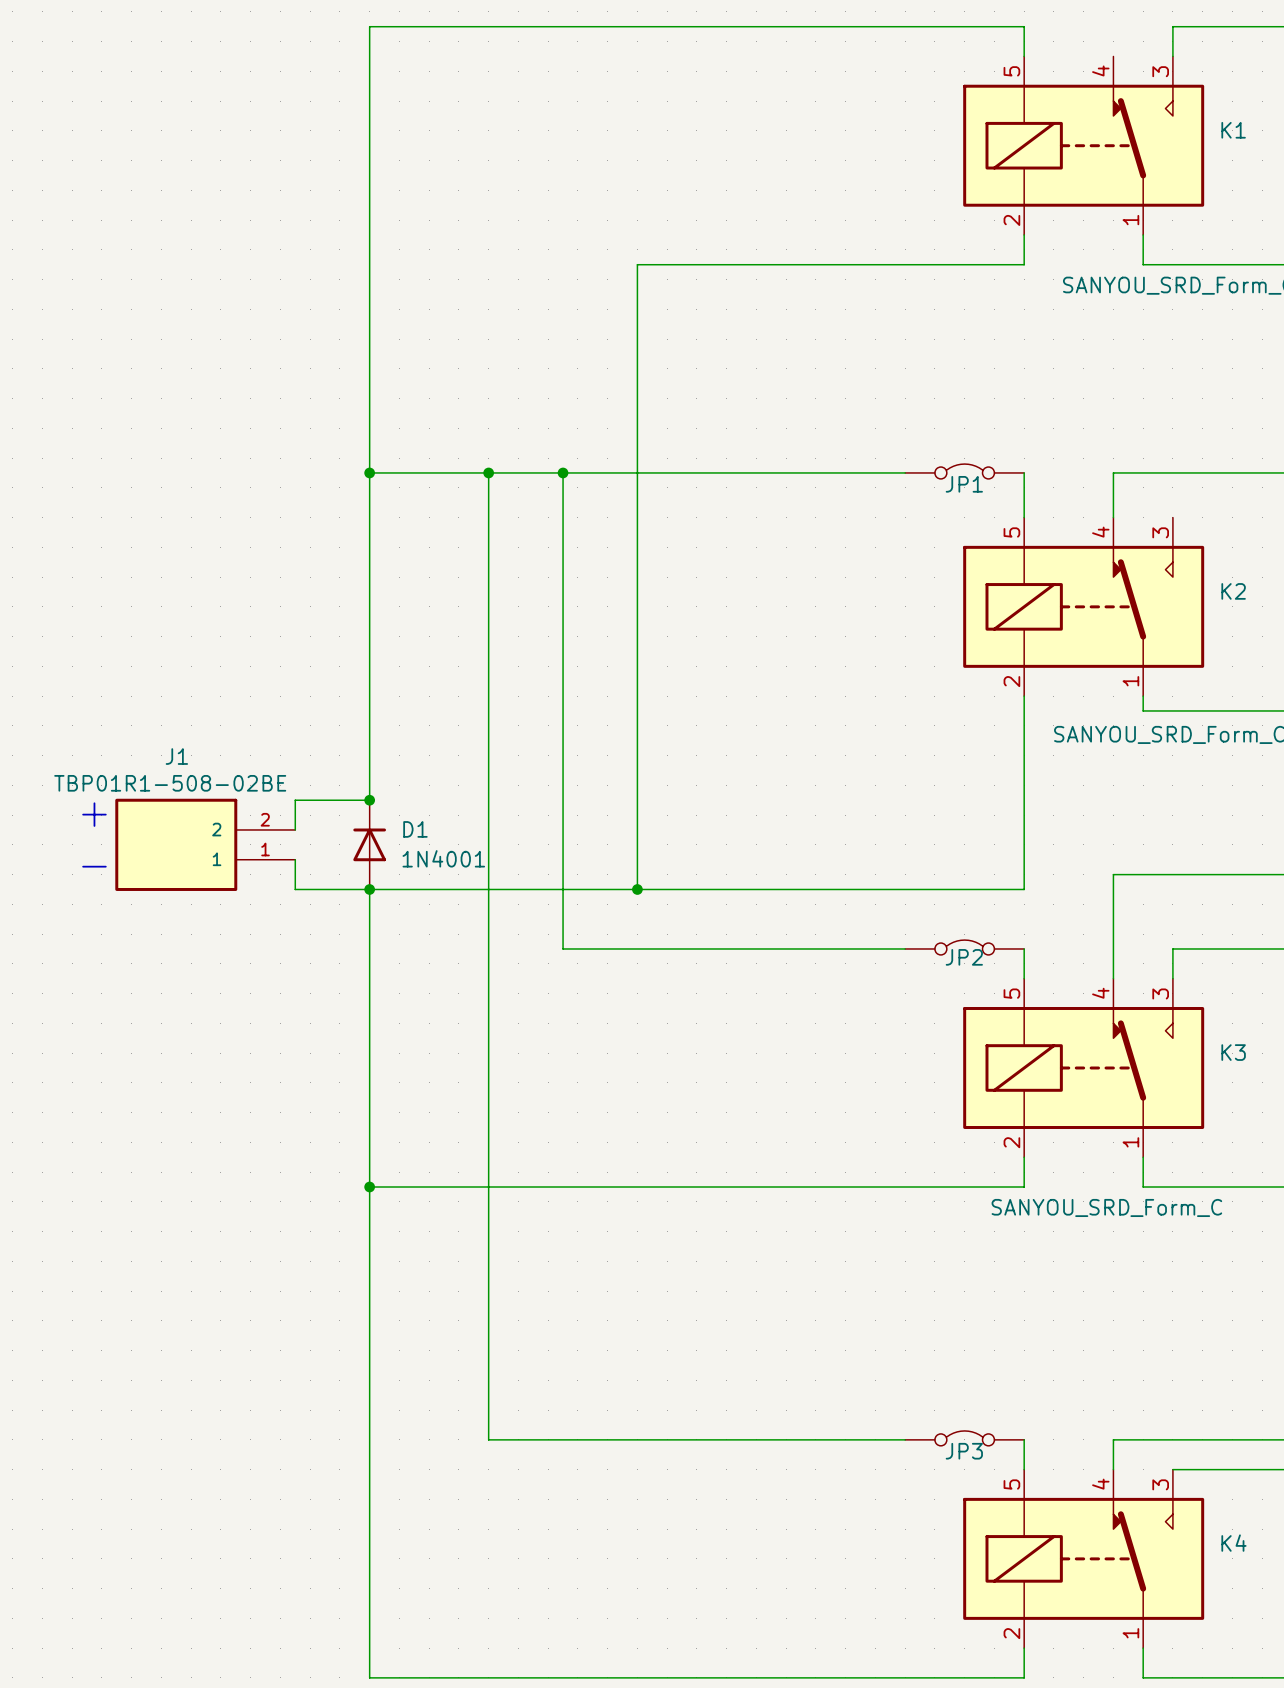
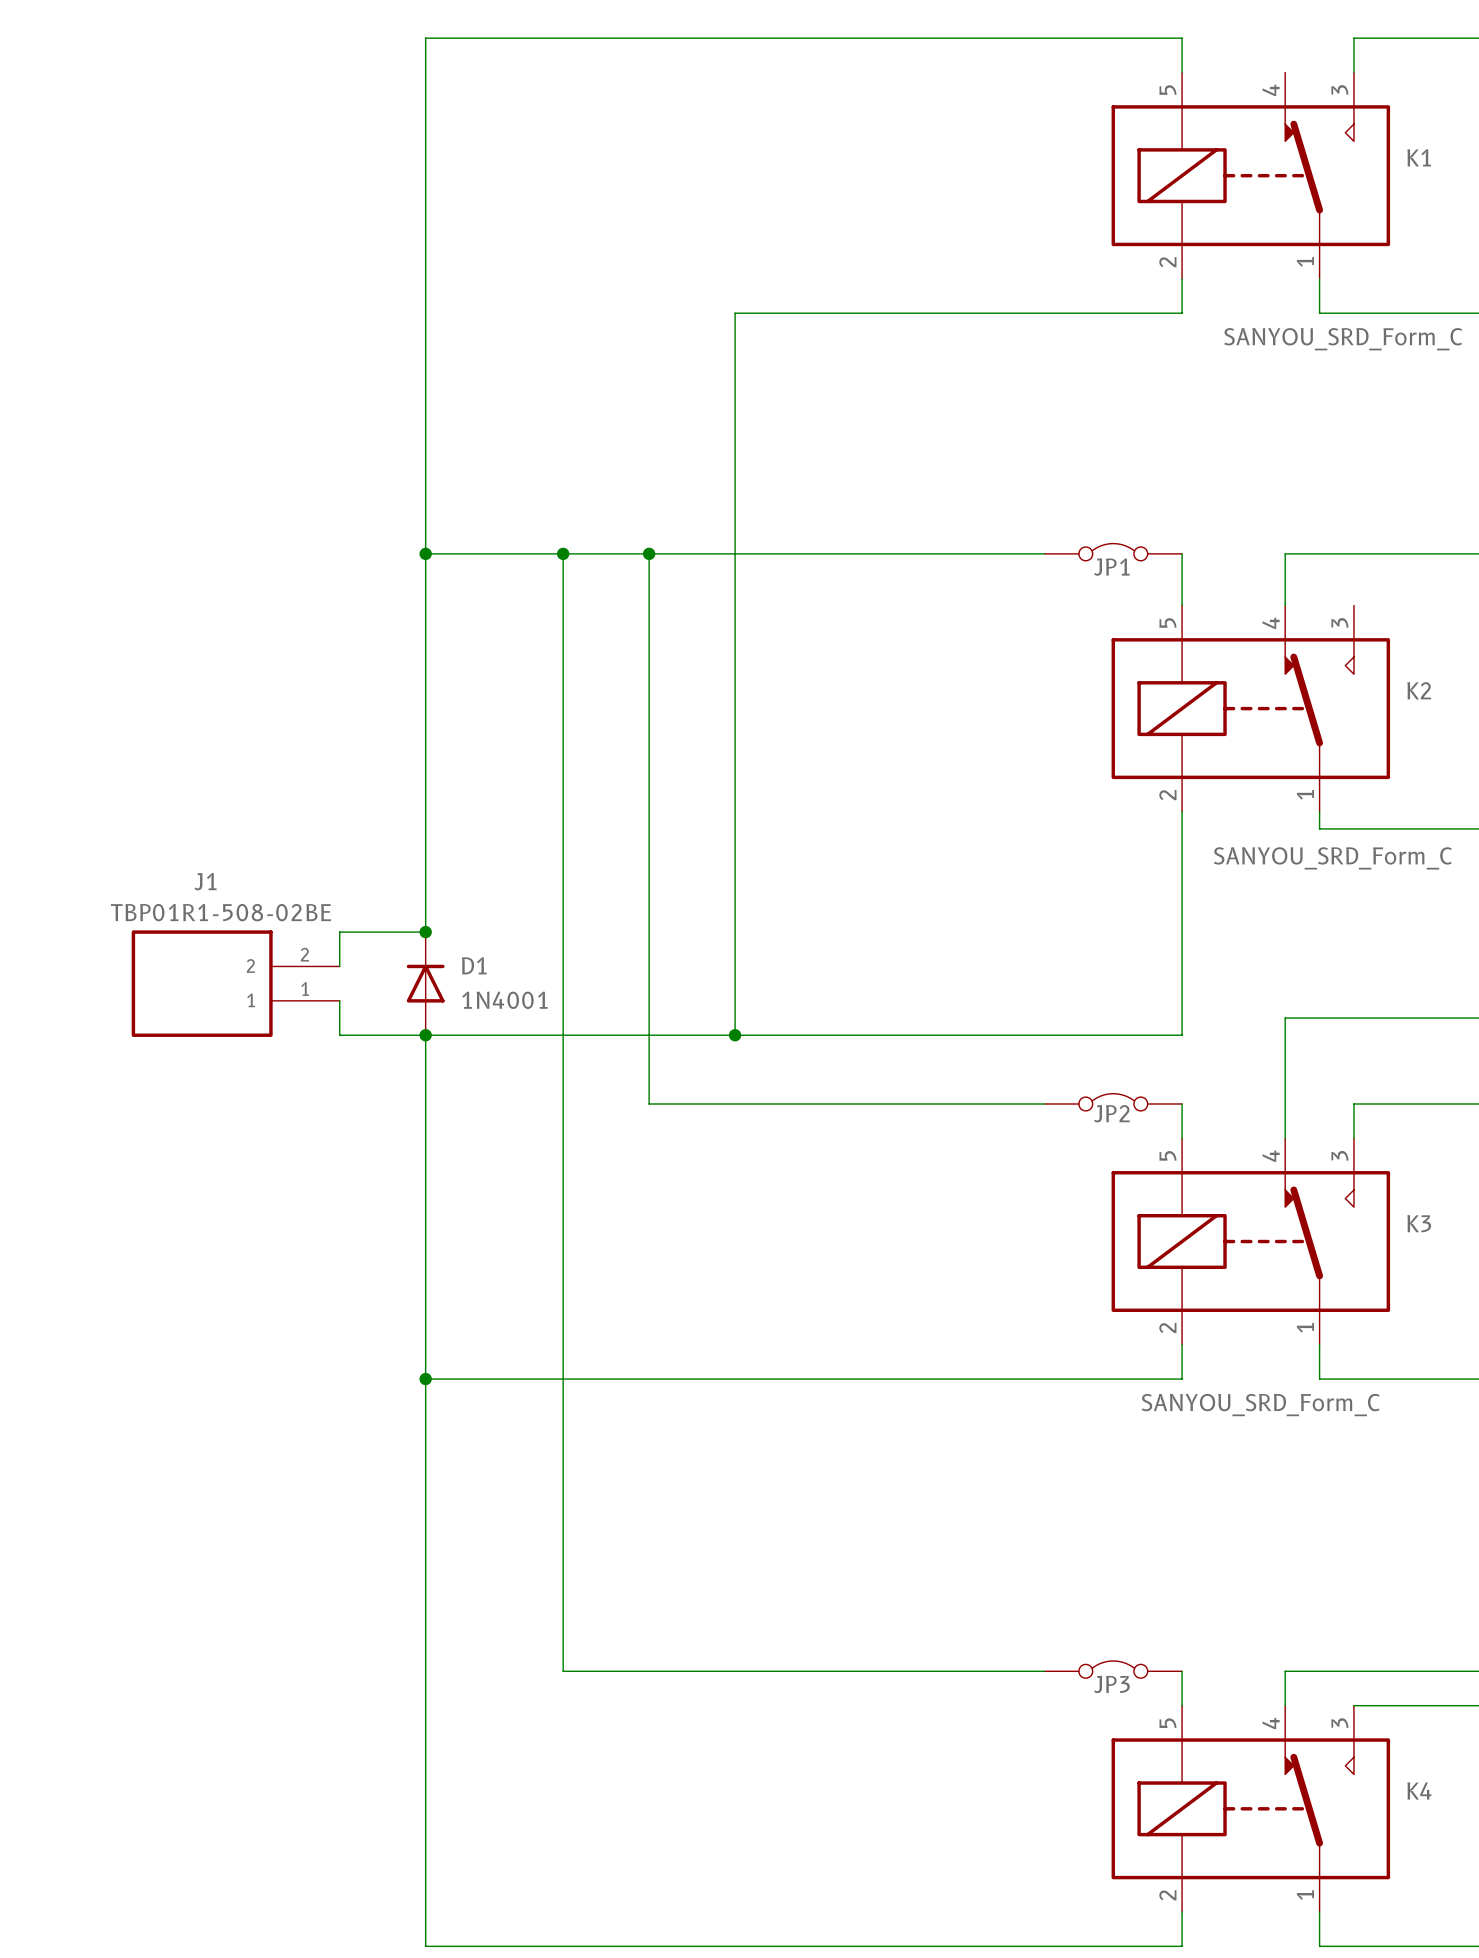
text: + (94, 814) -> none
text: - (94, 866) -> none

